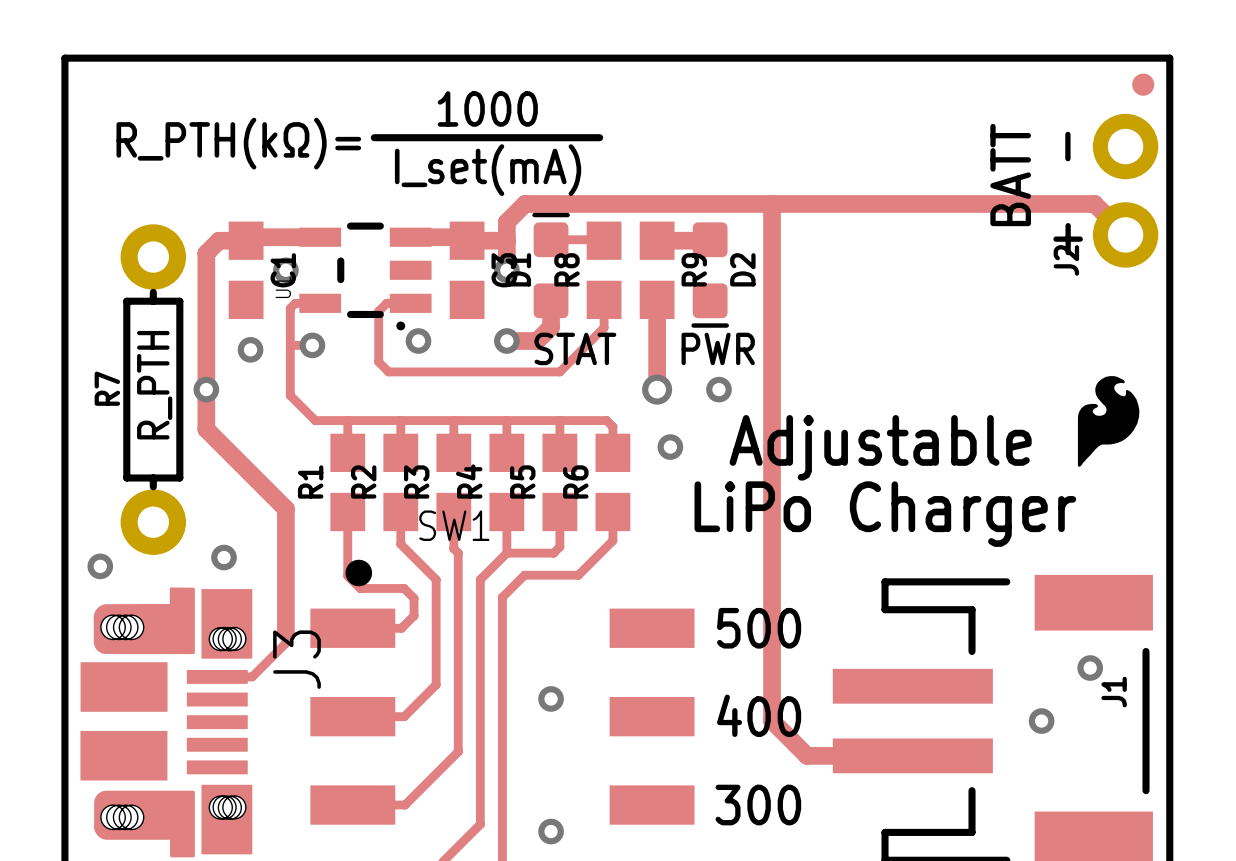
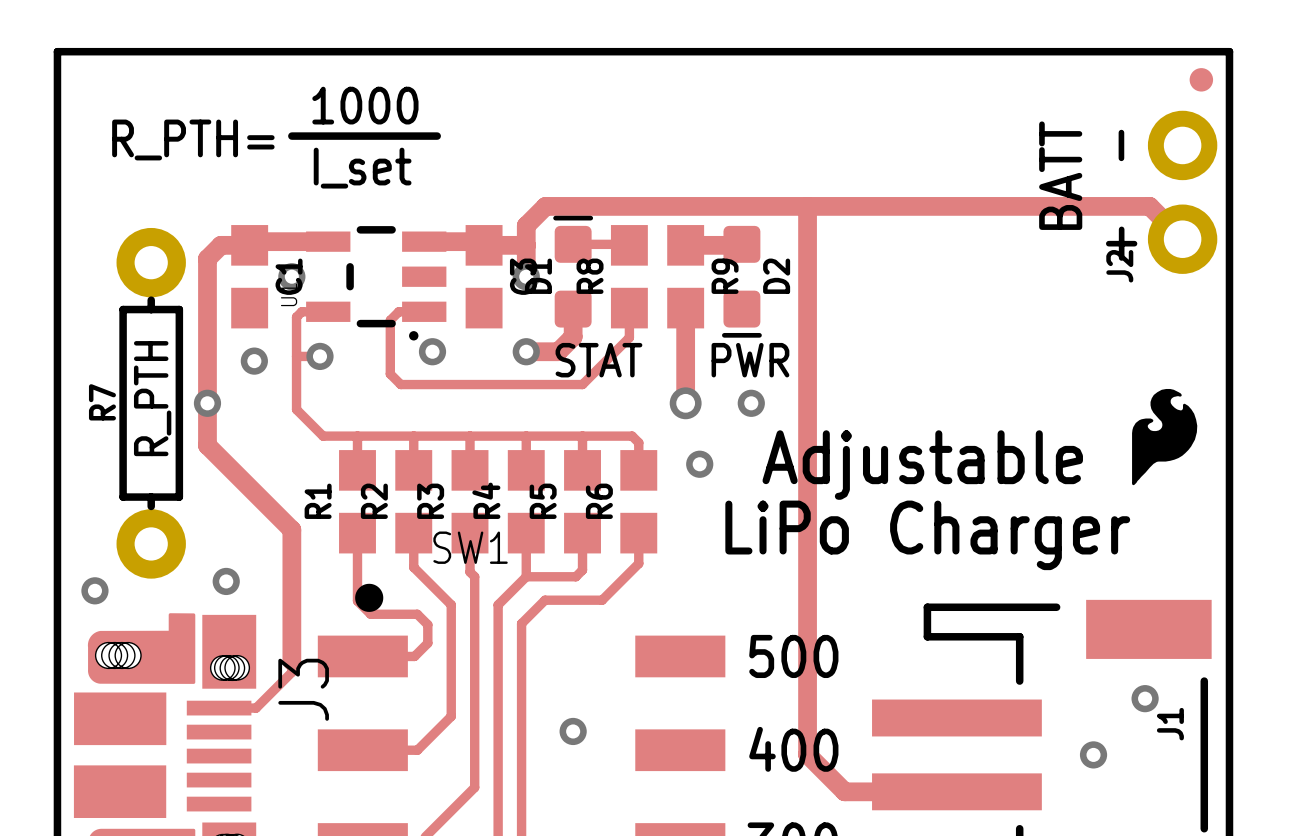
text position: 1000 (487, 108) -> 1000 (365, 105)
line: none -> (291, 136) (385, 136)
line: (422, 137) (599, 137) -> none
text: R_PTH(kΩ)= (238, 143) -> R_PTH= (193, 139)
text: I_set(mA) (488, 170) -> I_set (362, 168)

